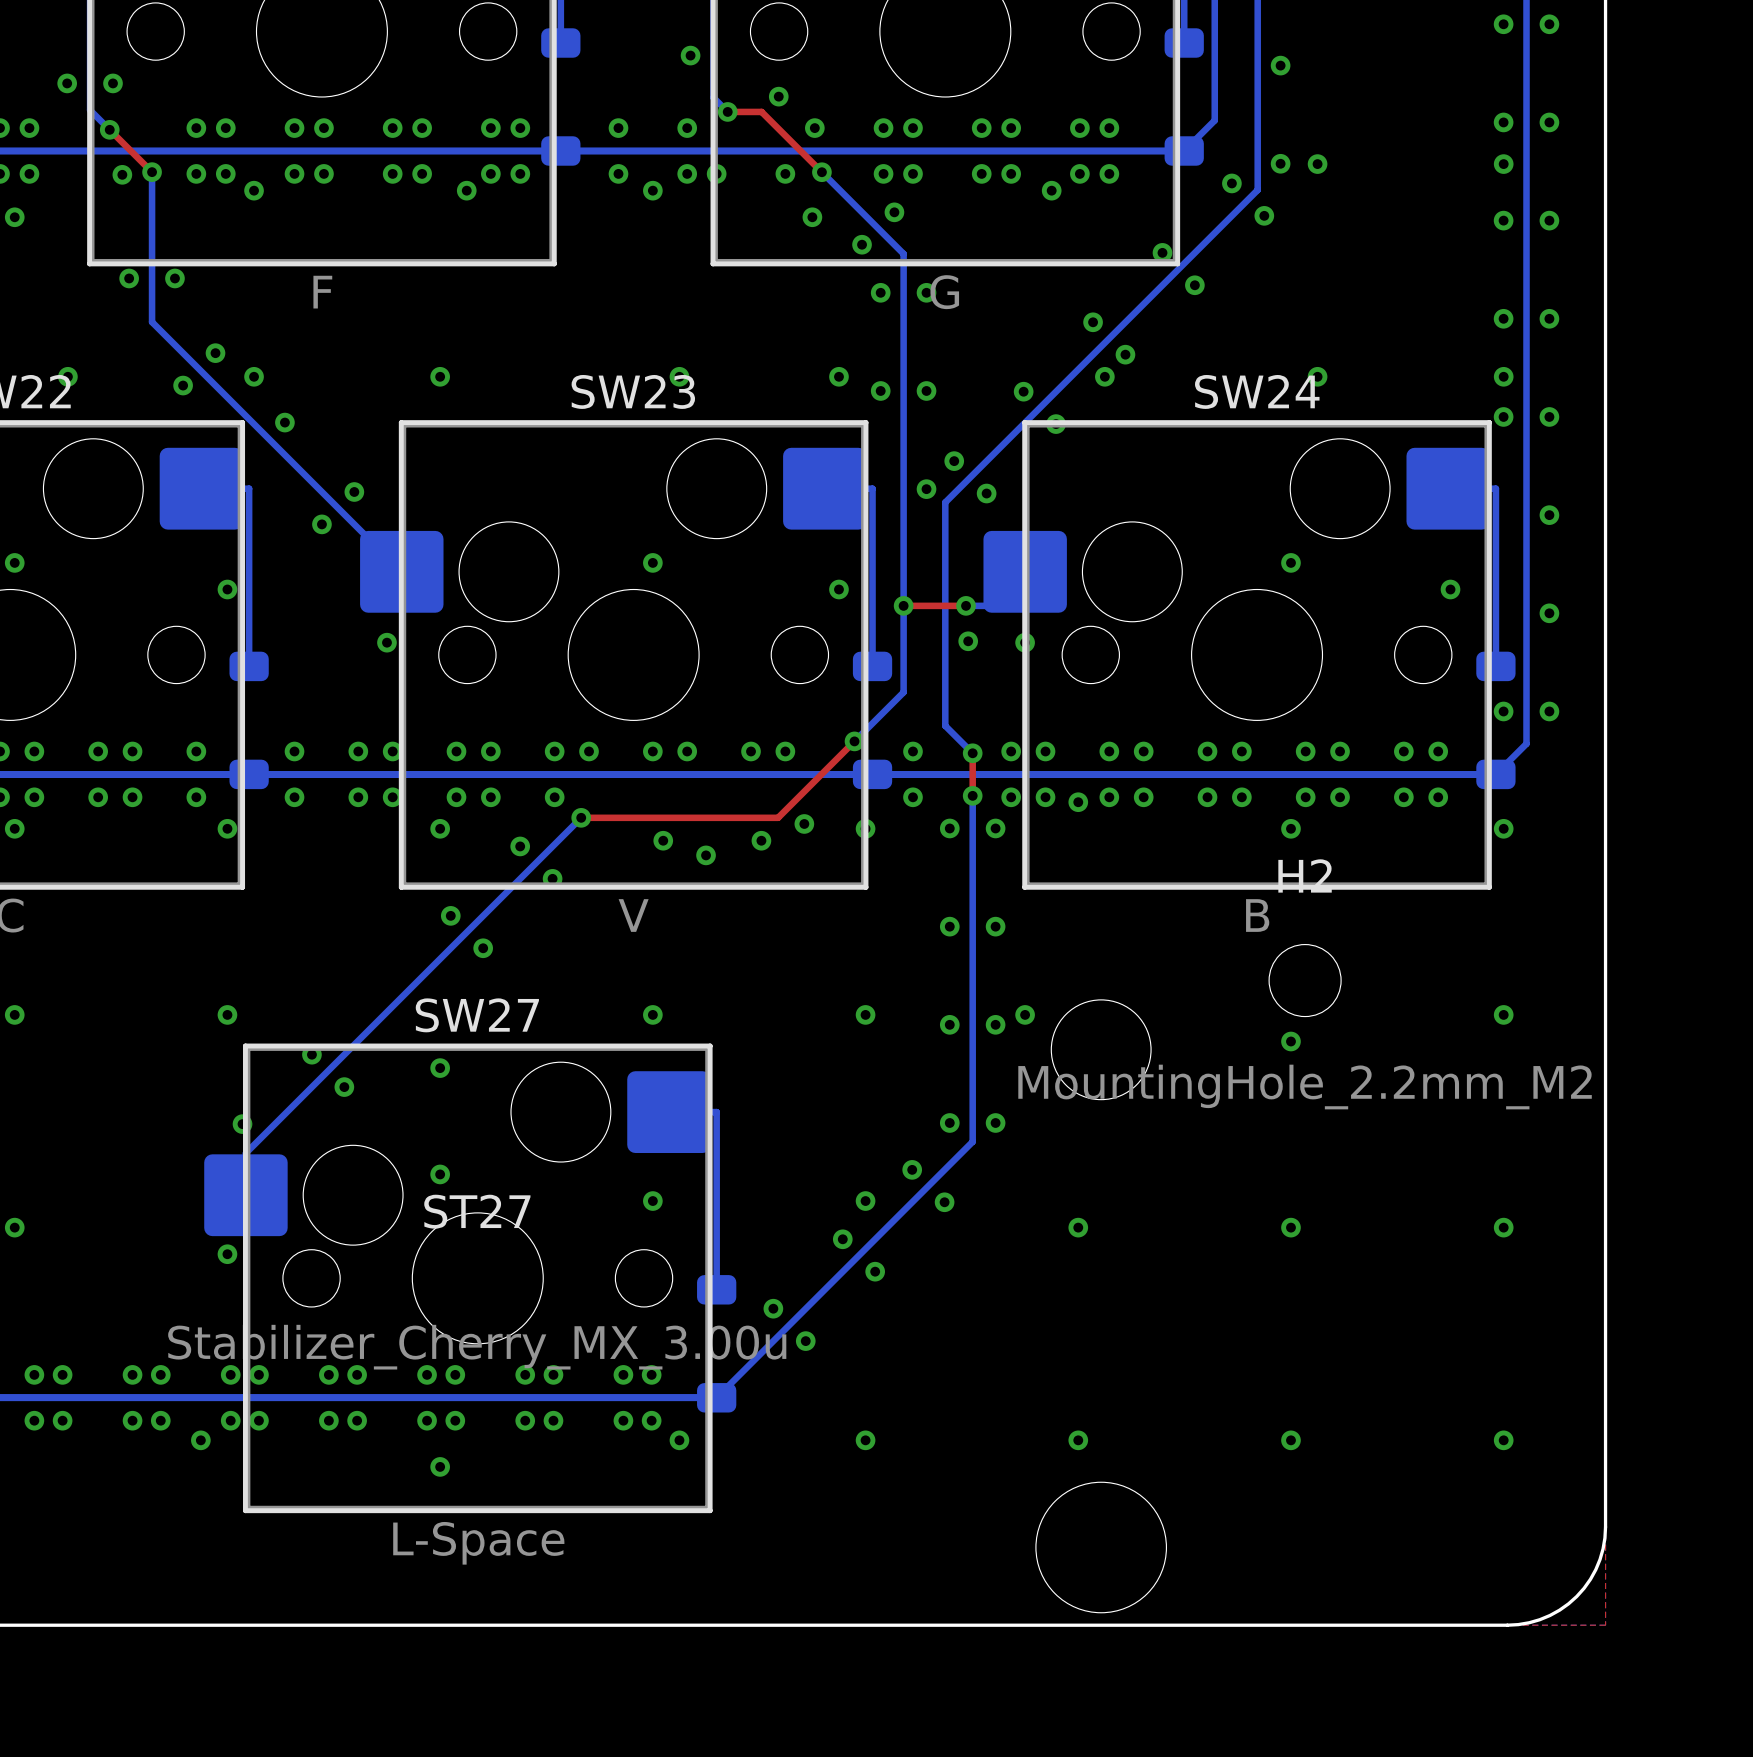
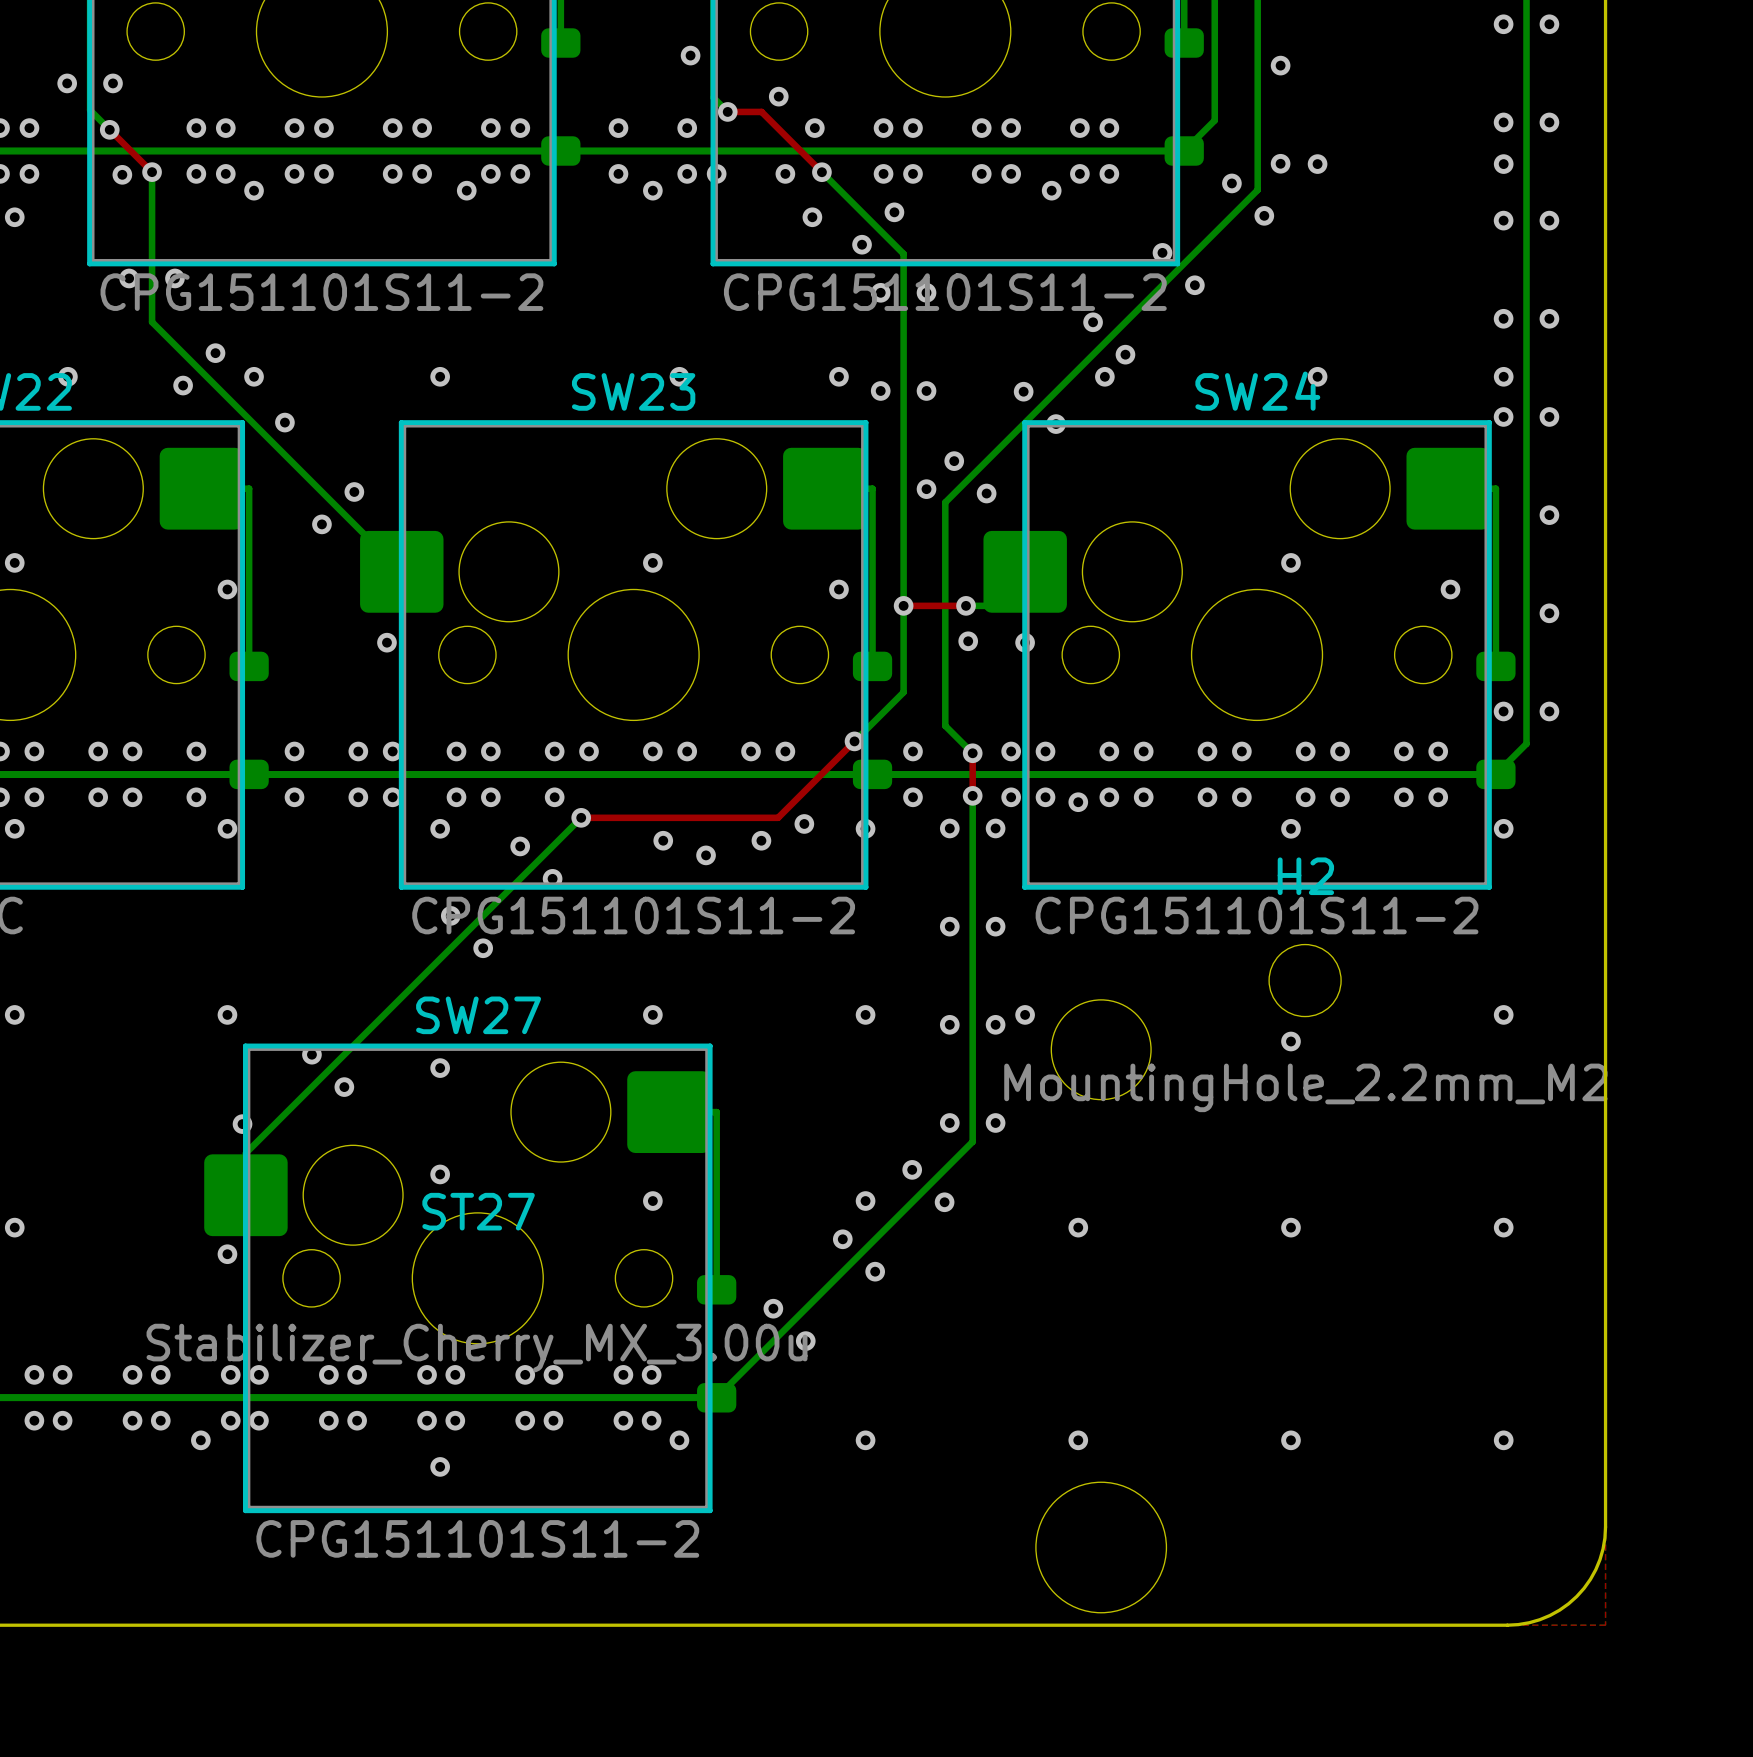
part value: F (322, 292) -> CPG151101S11-2 (321, 292)
part value: G (944, 292) -> CPG151101S11-2 (945, 292)
SW23 value: V (633, 915) -> CPG151101S11-2 (633, 915)
SW24 value: B (1257, 915) -> CPG151101S11-2 (1257, 915)
SW27 value: L-Space (478, 1543) -> CPG151101S11-2 (477, 1538)

